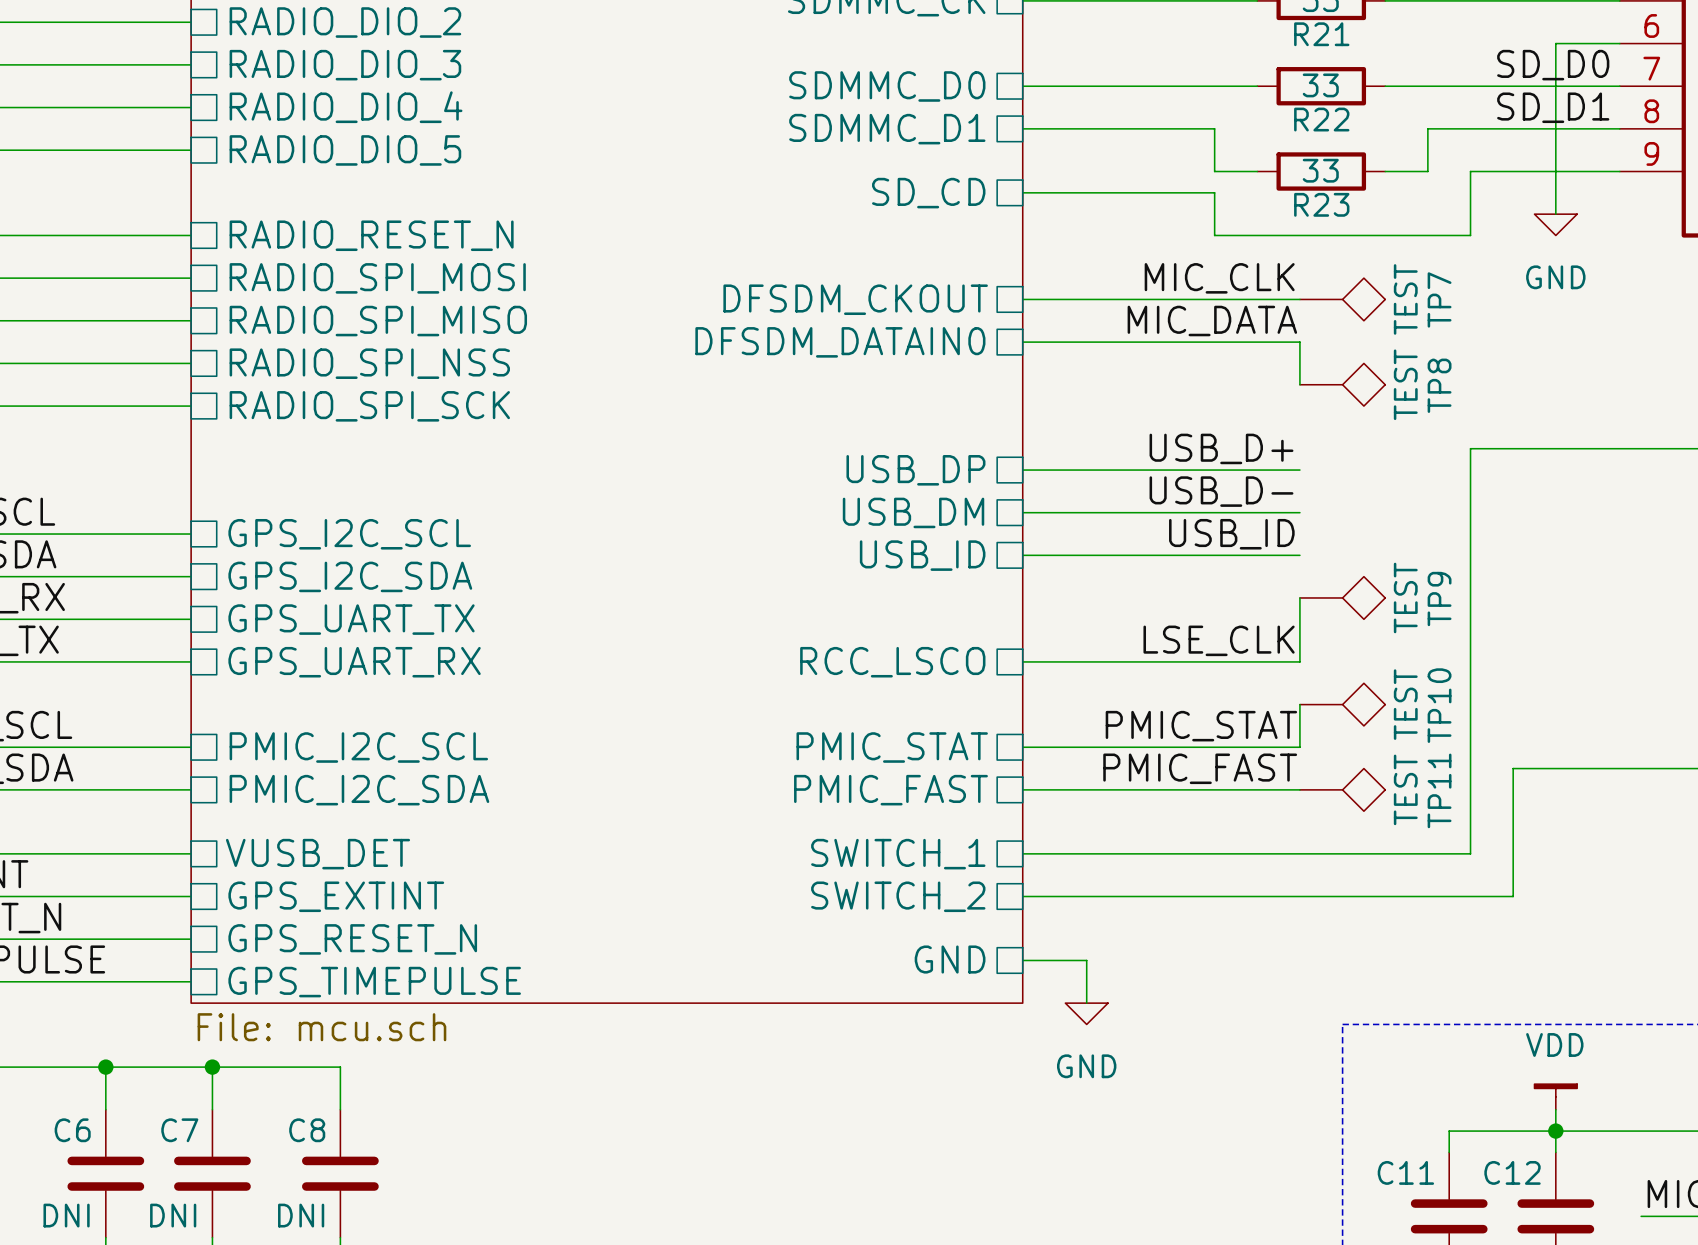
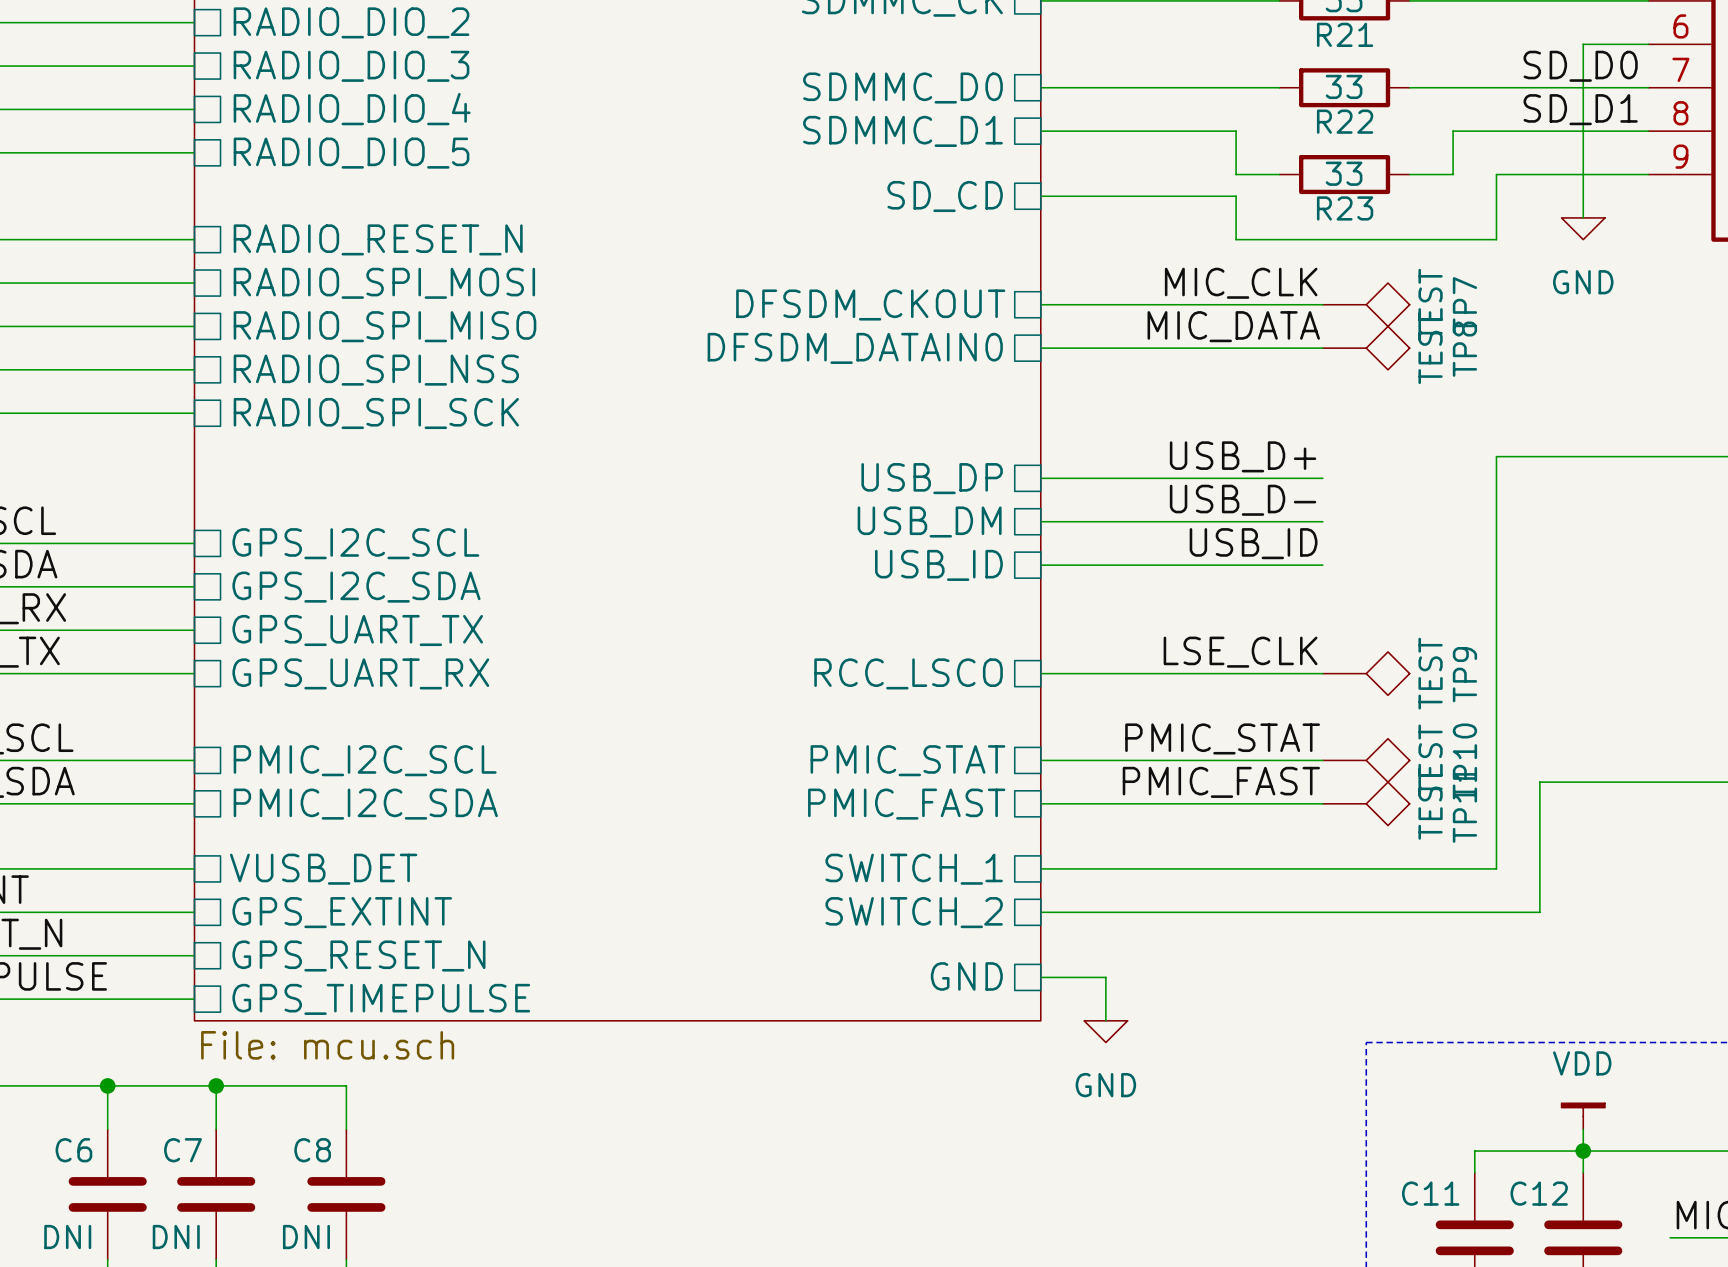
wire: (1299, 342) (1299, 384) -> none
TP8 position: (1342, 384) -> (1366, 348)
wire: (1299, 597) (1299, 661) -> none
TP9 position: (1342, 597) -> (1366, 673)
wire: (1299, 704) (1299, 747) -> none
TP10 position: (1342, 704) -> (1366, 760)

